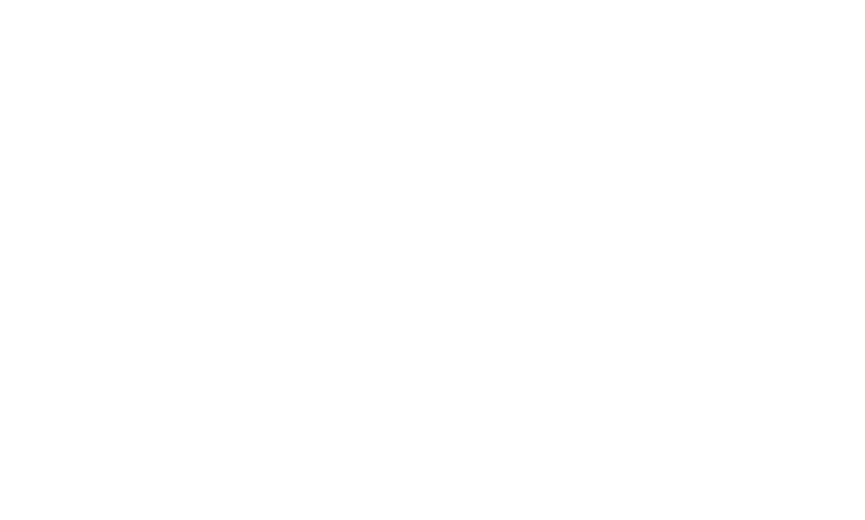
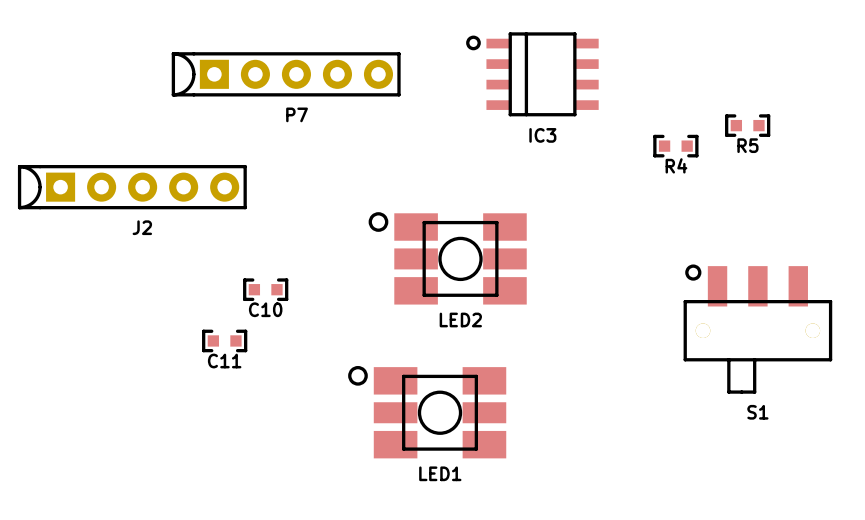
P7: none -> (286, 74)
IC3: none -> (532, 74)
R5: none -> (747, 125)
R4: none -> (675, 146)
J2: none -> (132, 187)
LED2: none -> (447, 258)
C10: none -> (265, 289)
S1: none -> (757, 329)
C11: none -> (224, 340)
LED1: none -> (427, 412)

